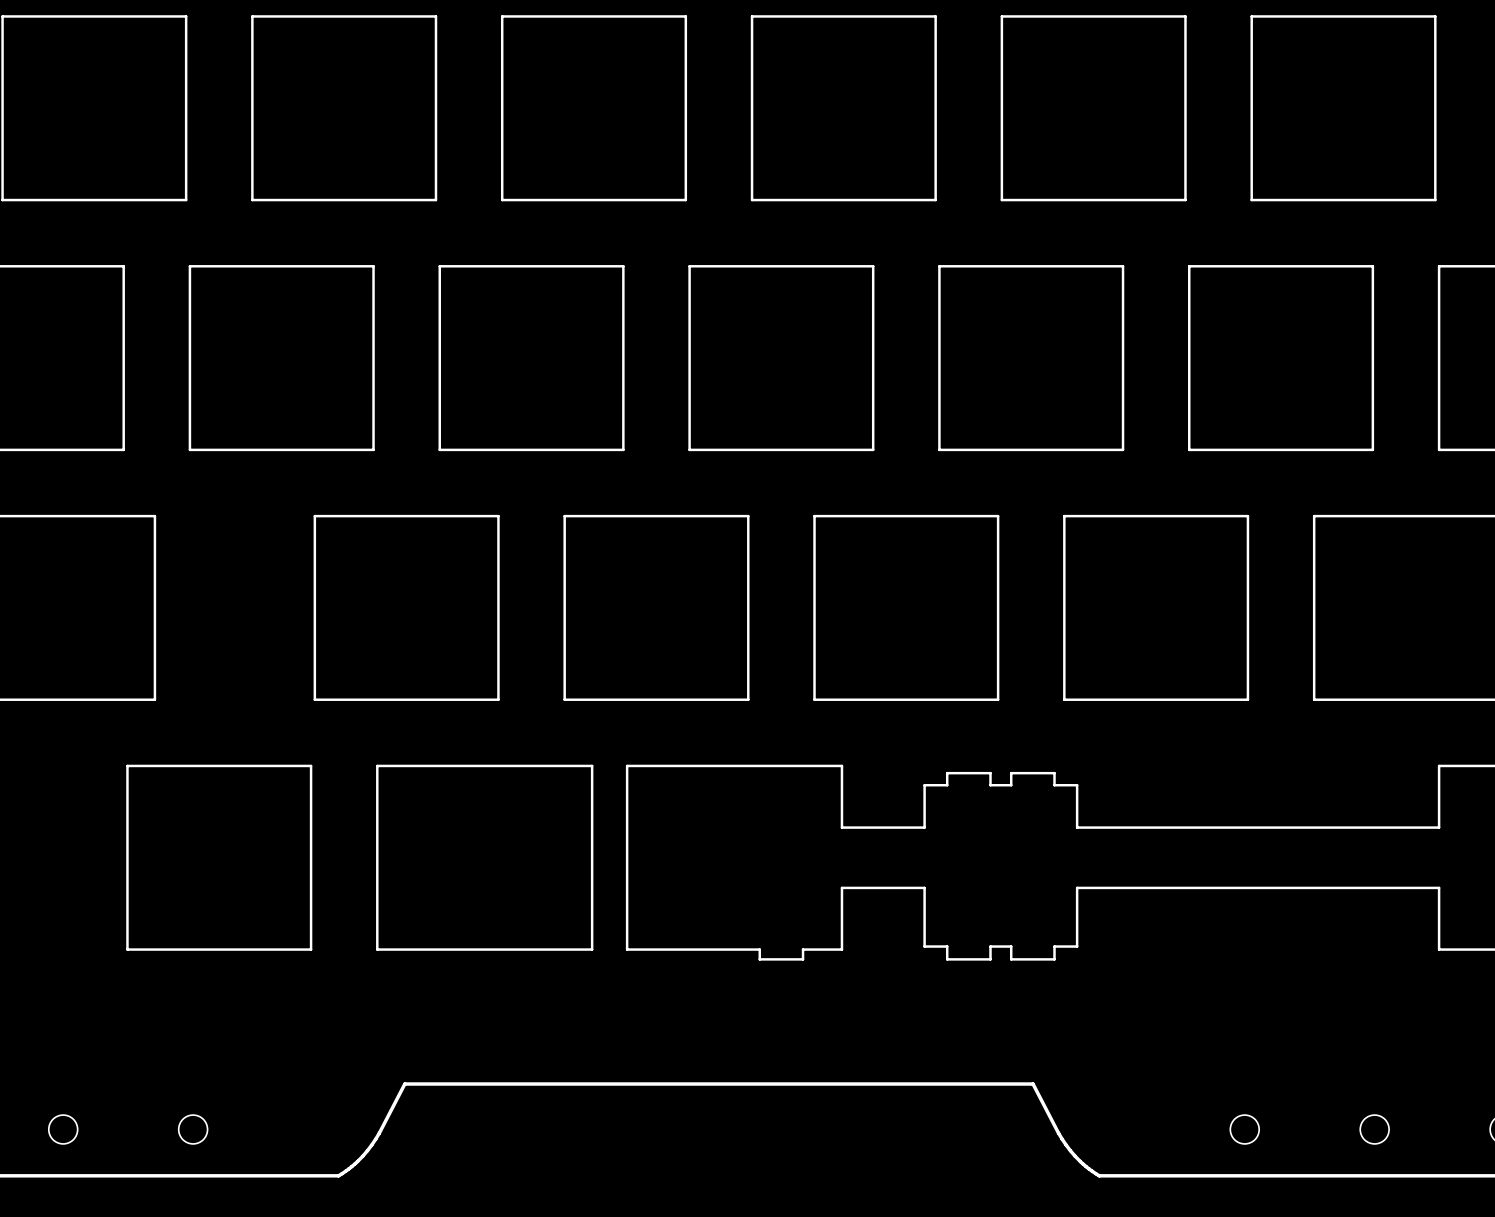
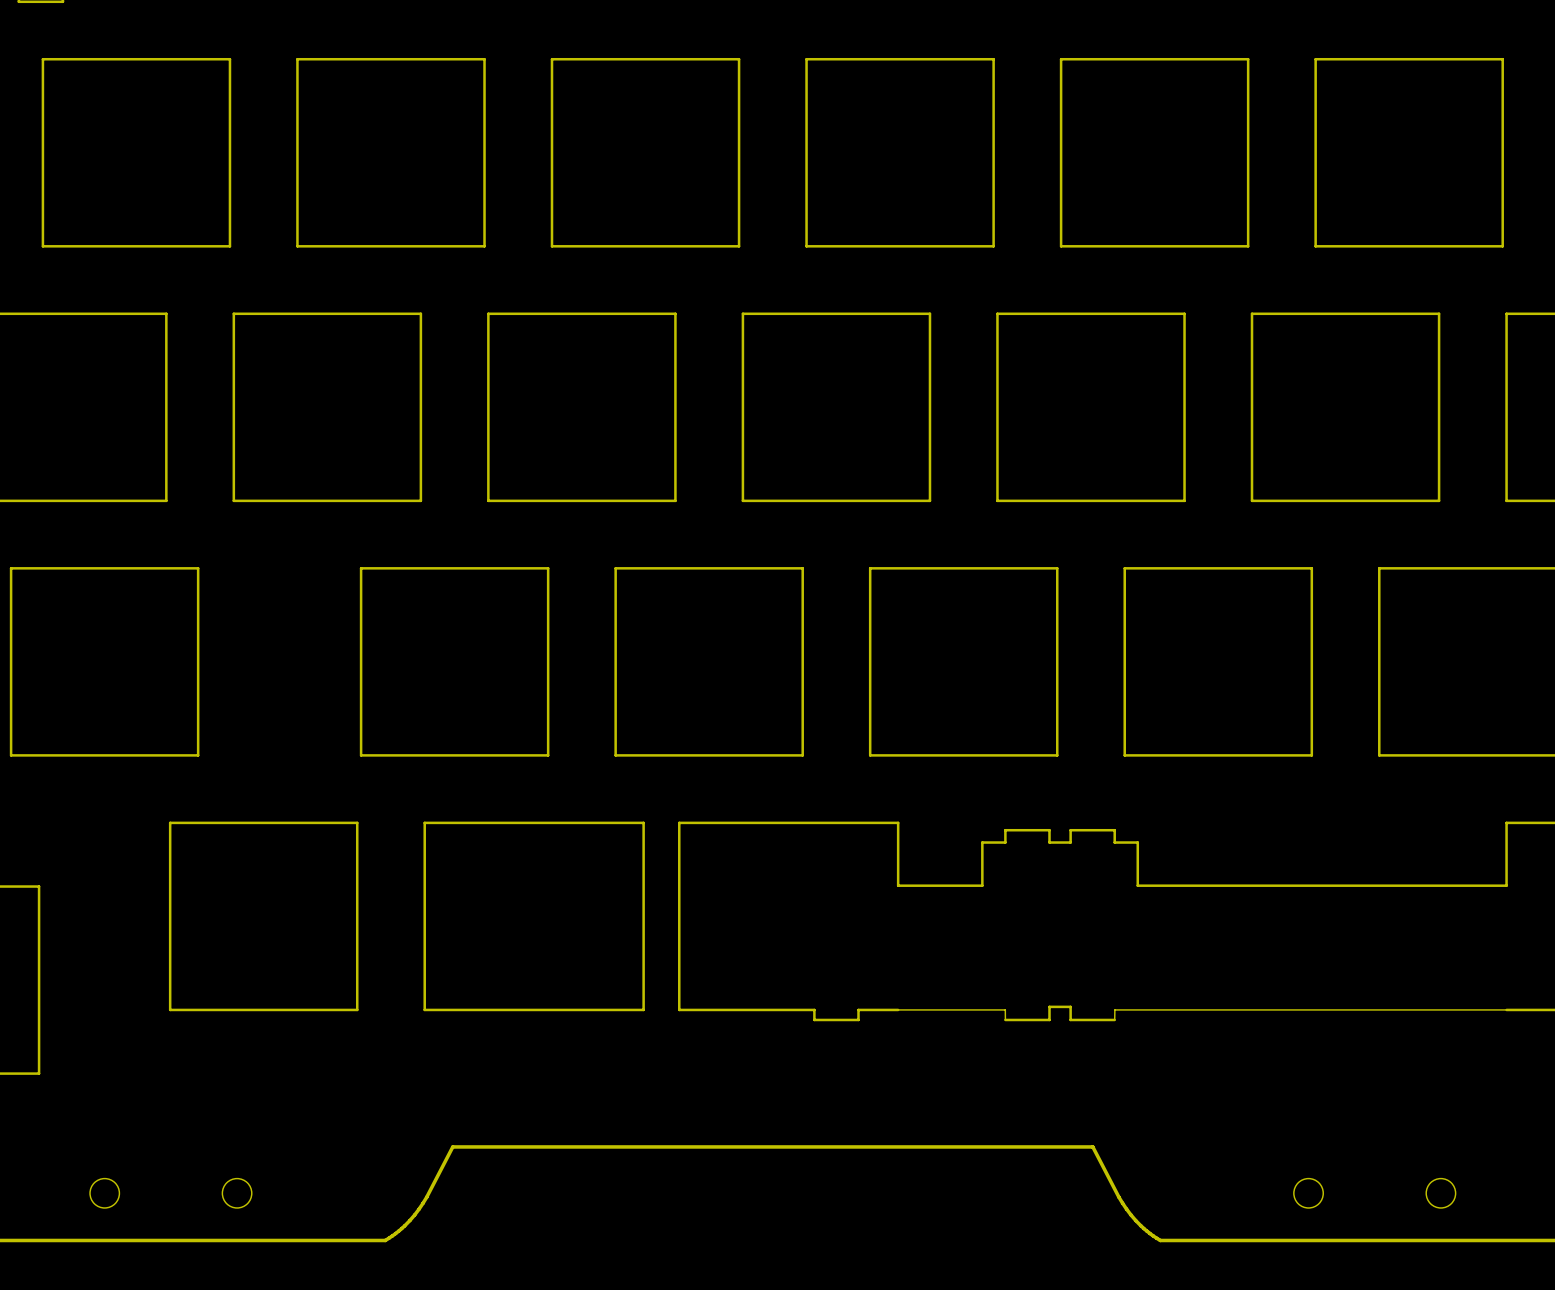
board edge: (841, 949) (841, 887) (924, 887) (924, 946) (947, 946) (947, 959) -> (898, 1009) (1005, 1009) (1005, 1019)
board edge: (1439, 949) (1439, 887) (1077, 887) (1077, 946) (1054, 946) (1054, 959) -> (1506, 1009) (1114, 1009) (1114, 1019)

